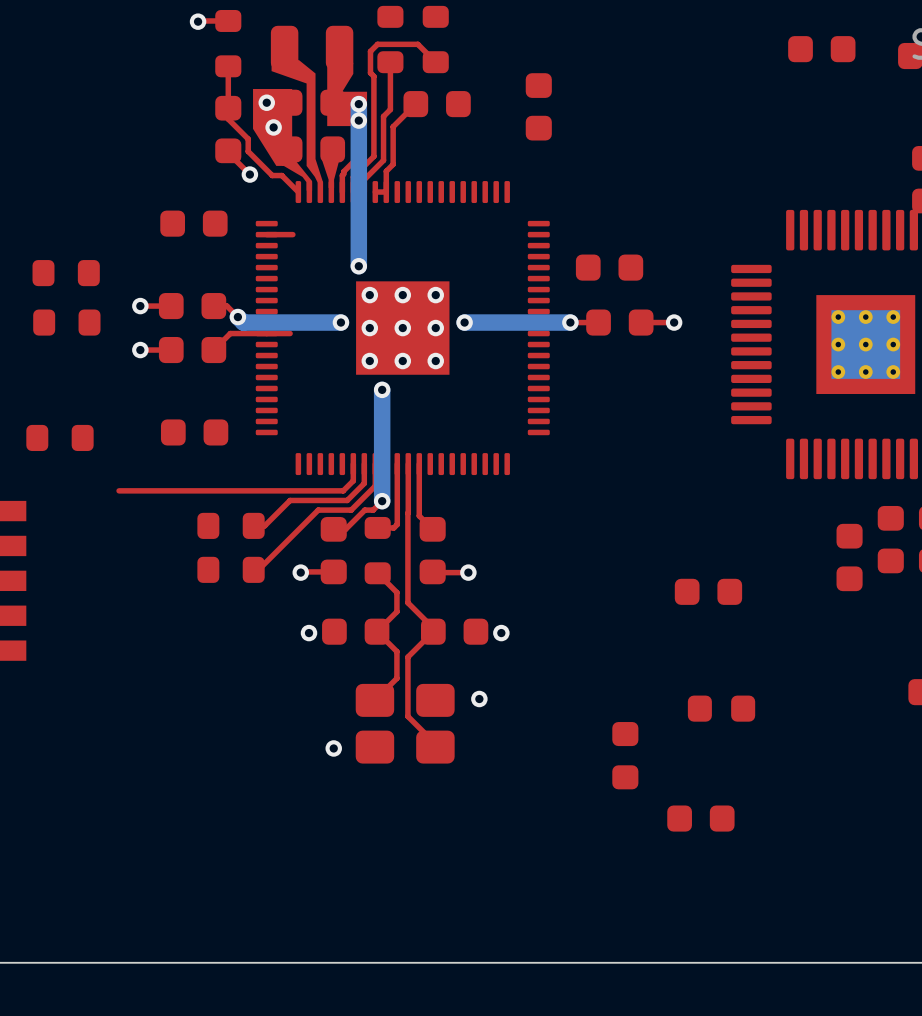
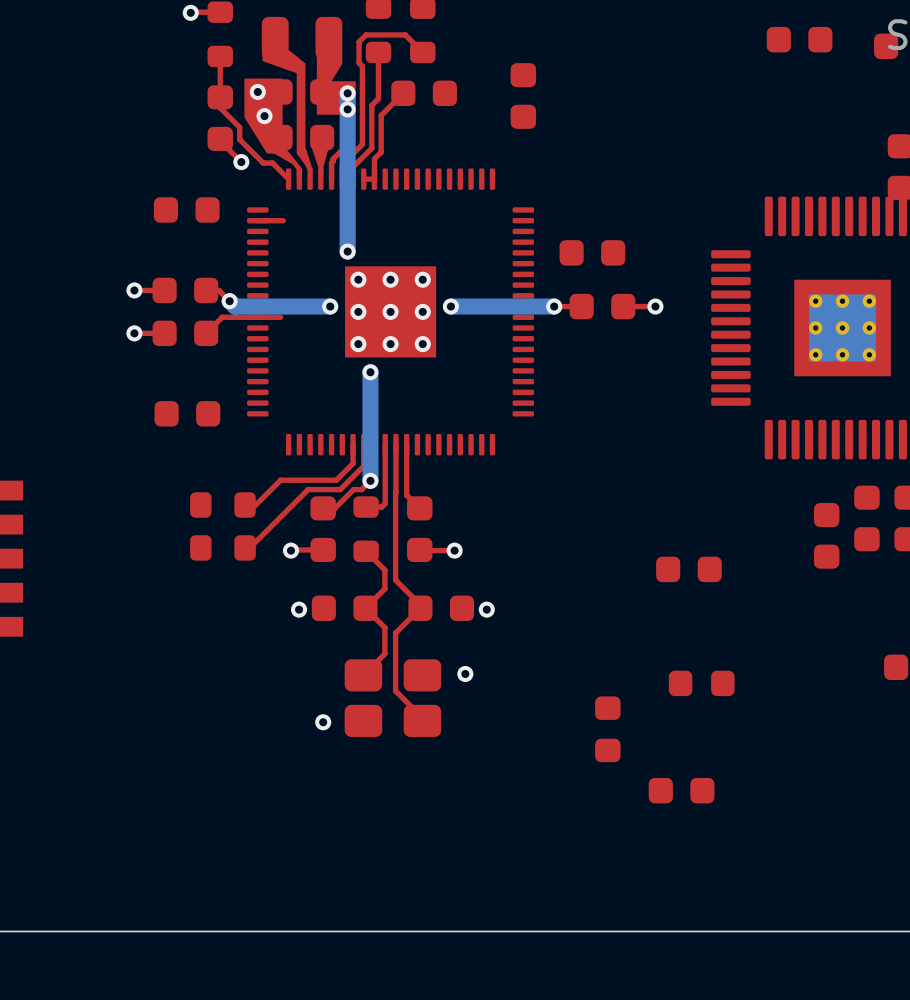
part: (66, 273) -> none
part: (66, 322) -> none
part: (59, 437) -> none
top track: (353, 464) (353, 480) (343, 490) (119, 490) -> none

